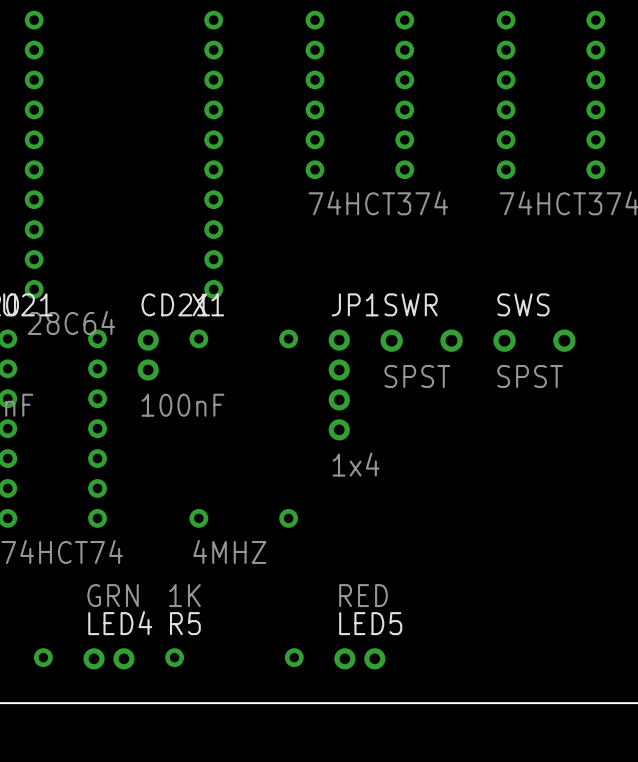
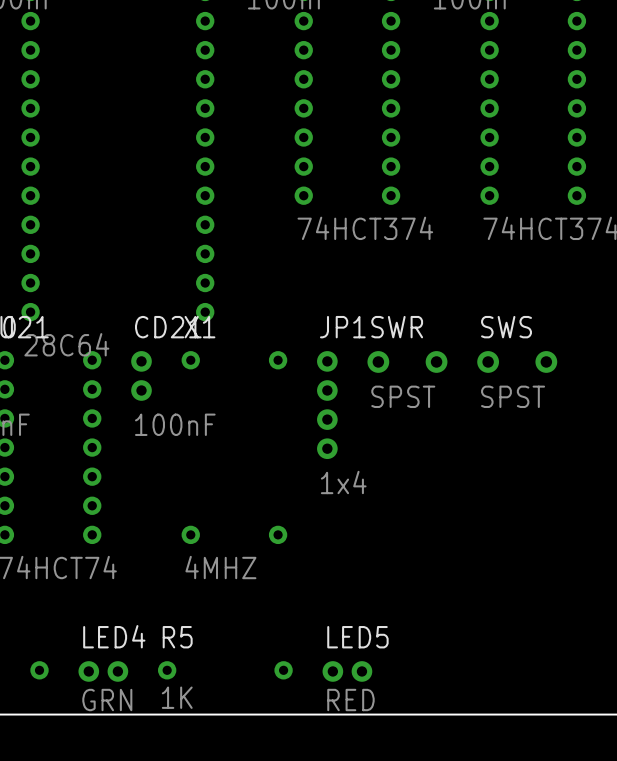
LED4 value position: GRN (113, 595) -> GRN (107, 700)
R5 value position: 1K (184, 595) -> 1K (177, 697)
LED5 value position: RED (363, 595) -> RED (350, 700)

